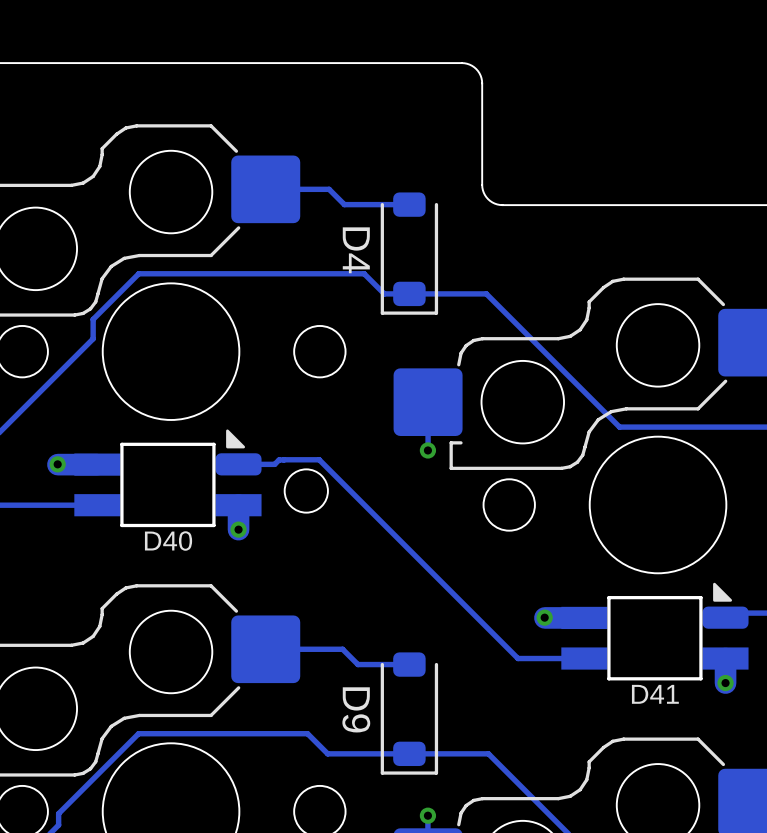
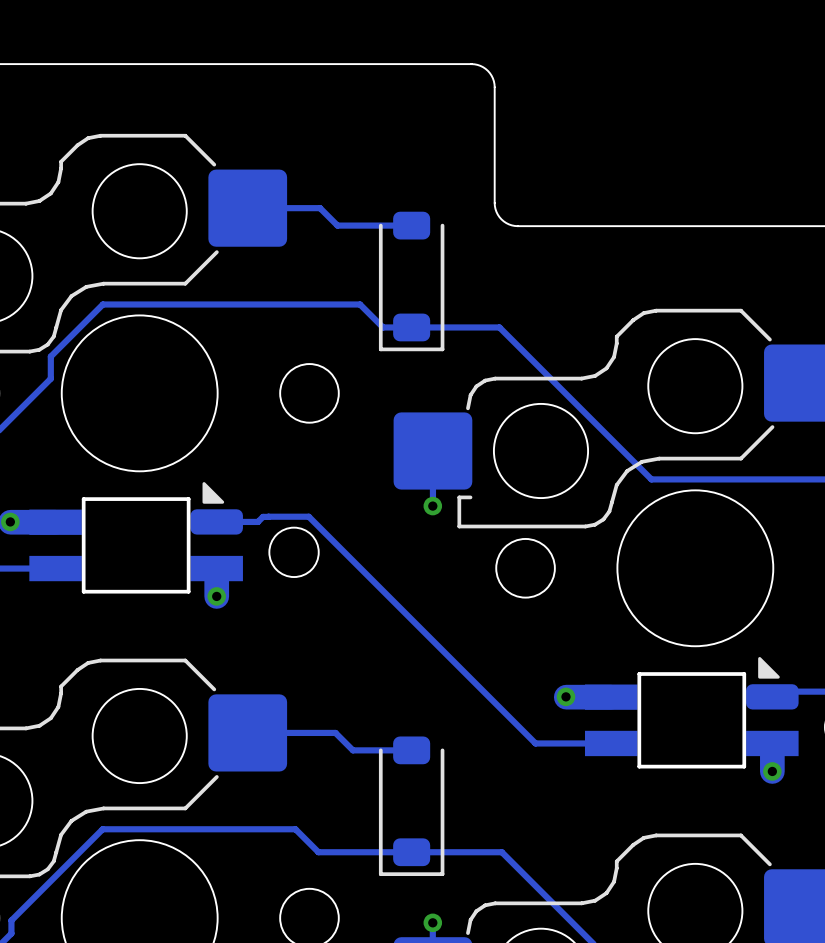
D4 name: D4 (356, 250) -> none
D40 name: D40 (168, 541) -> none
D41 name: D41 (655, 694) -> none
D9 name: D9 (356, 709) -> none

